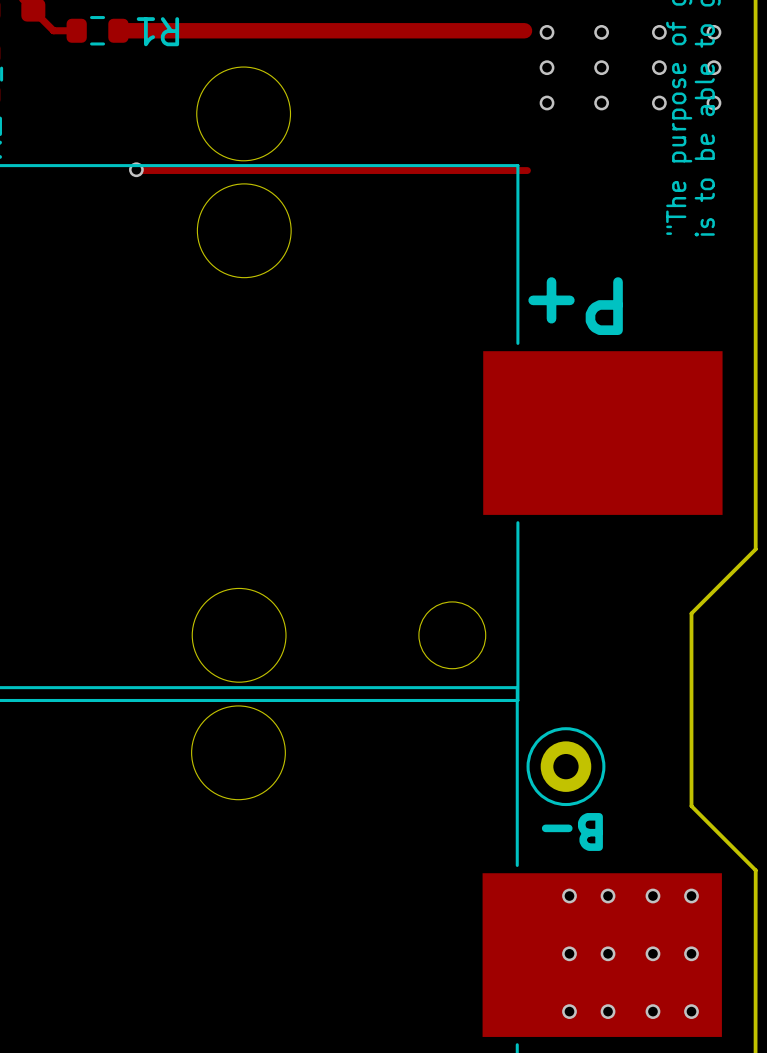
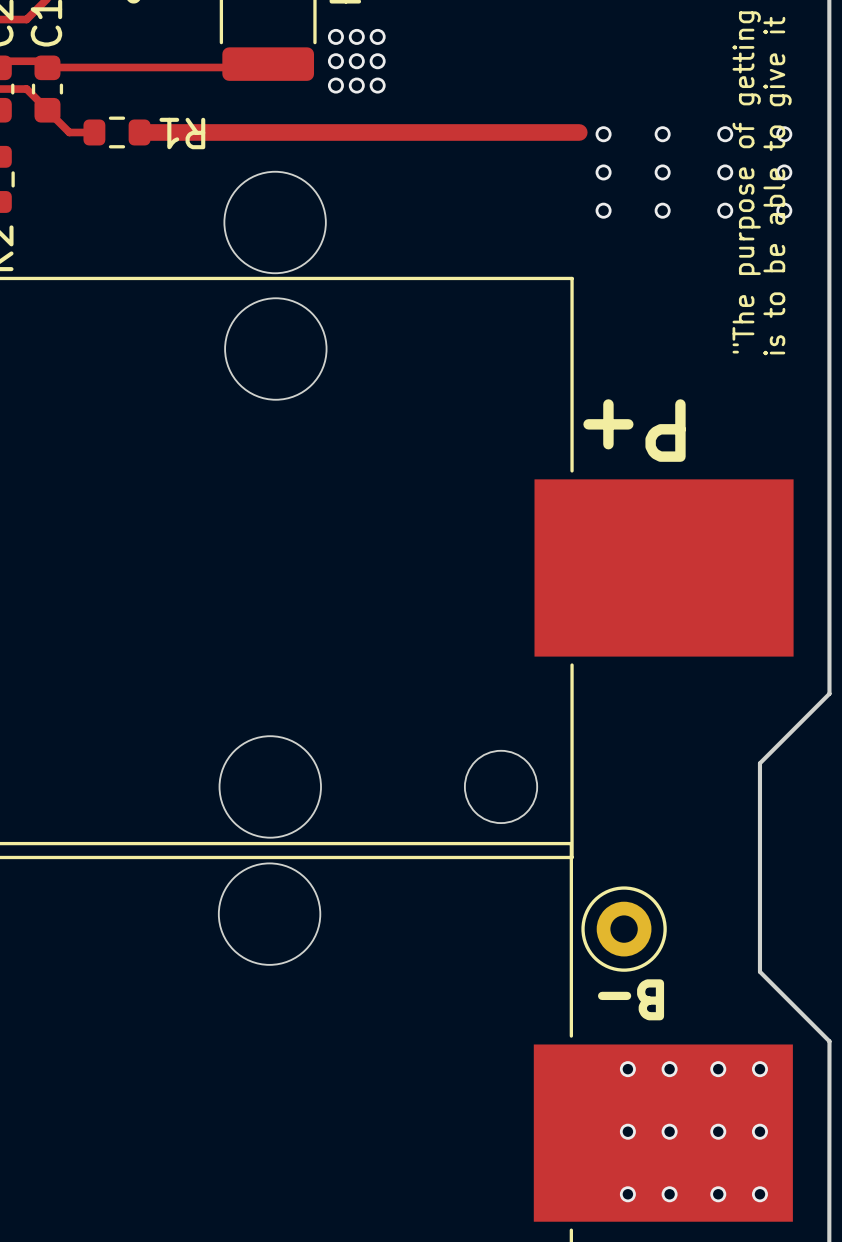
track: (136, 169) (527, 170) -> none
via: (136, 169) -> none

